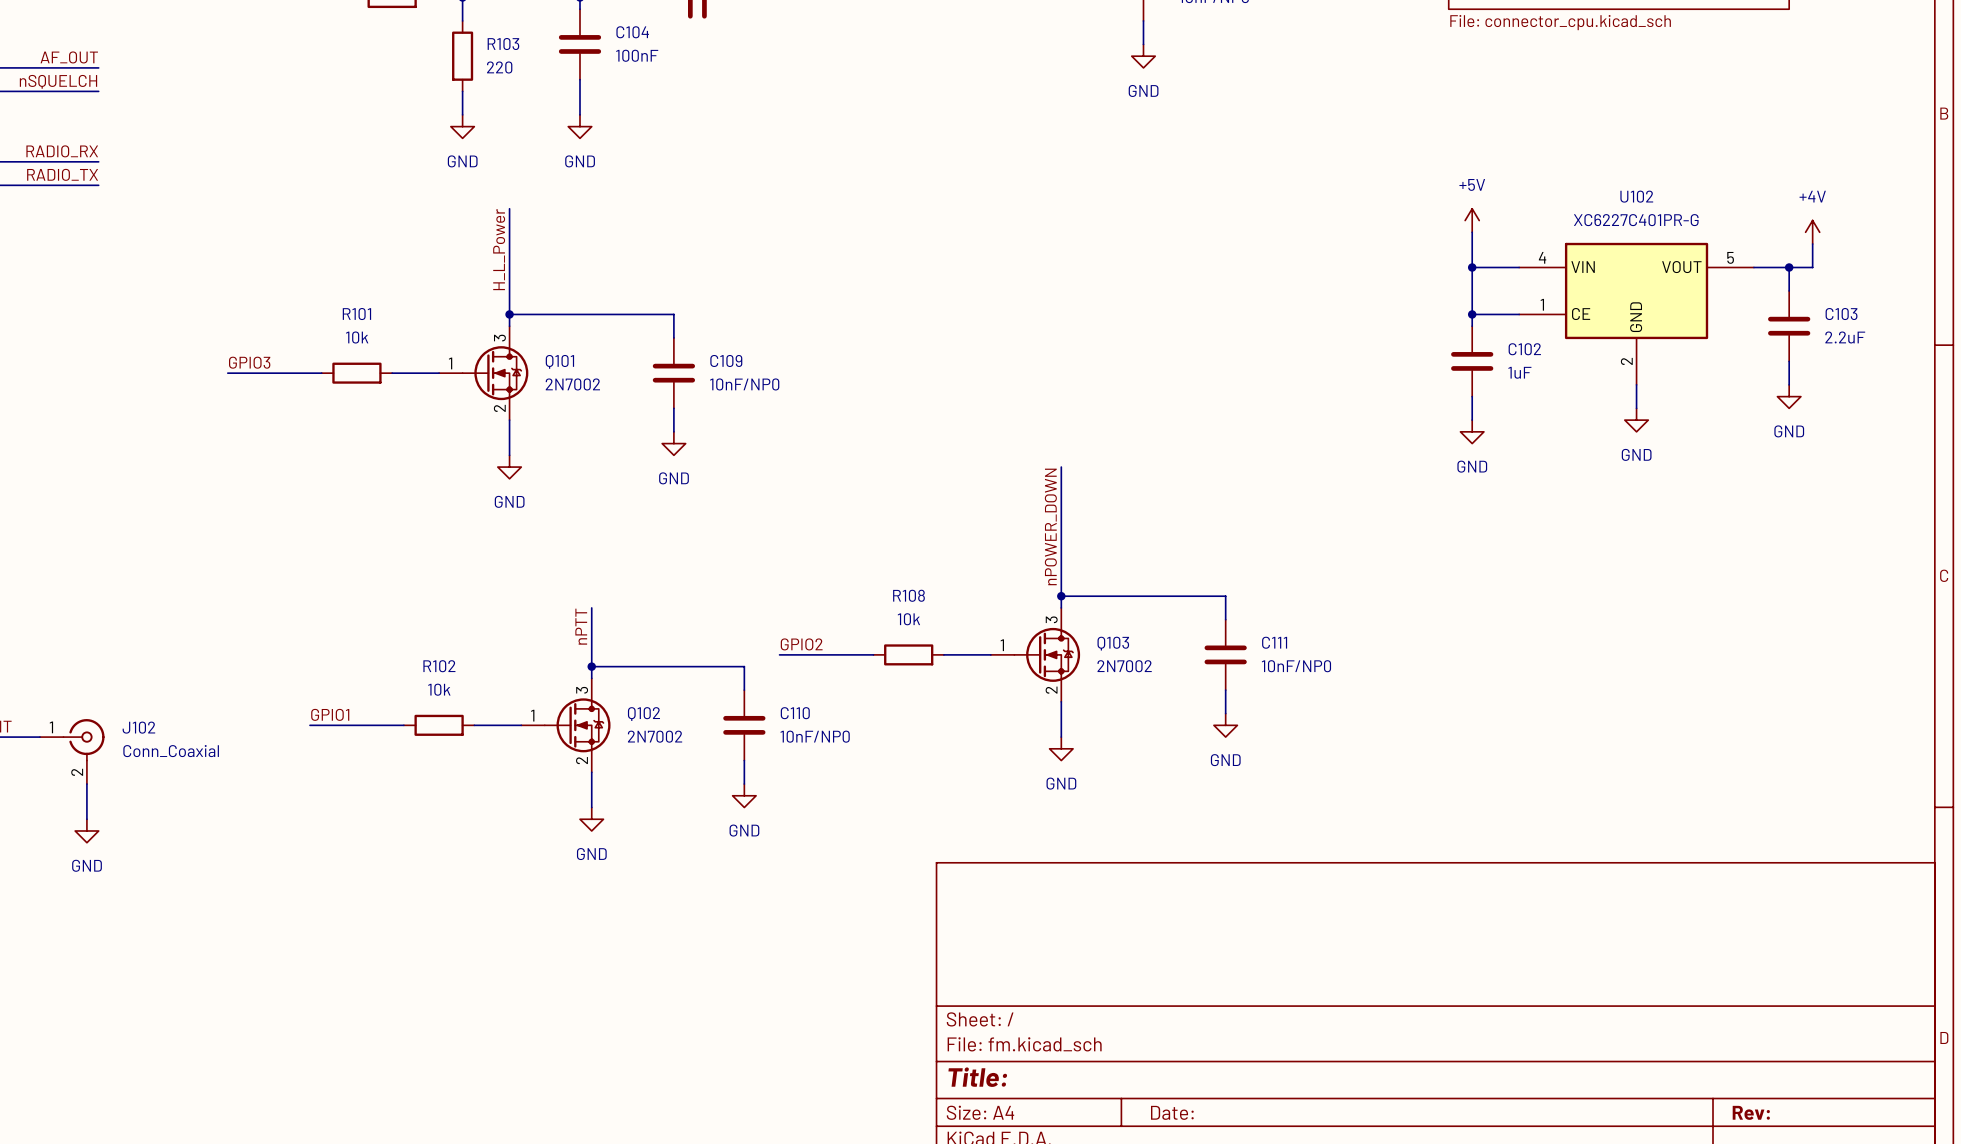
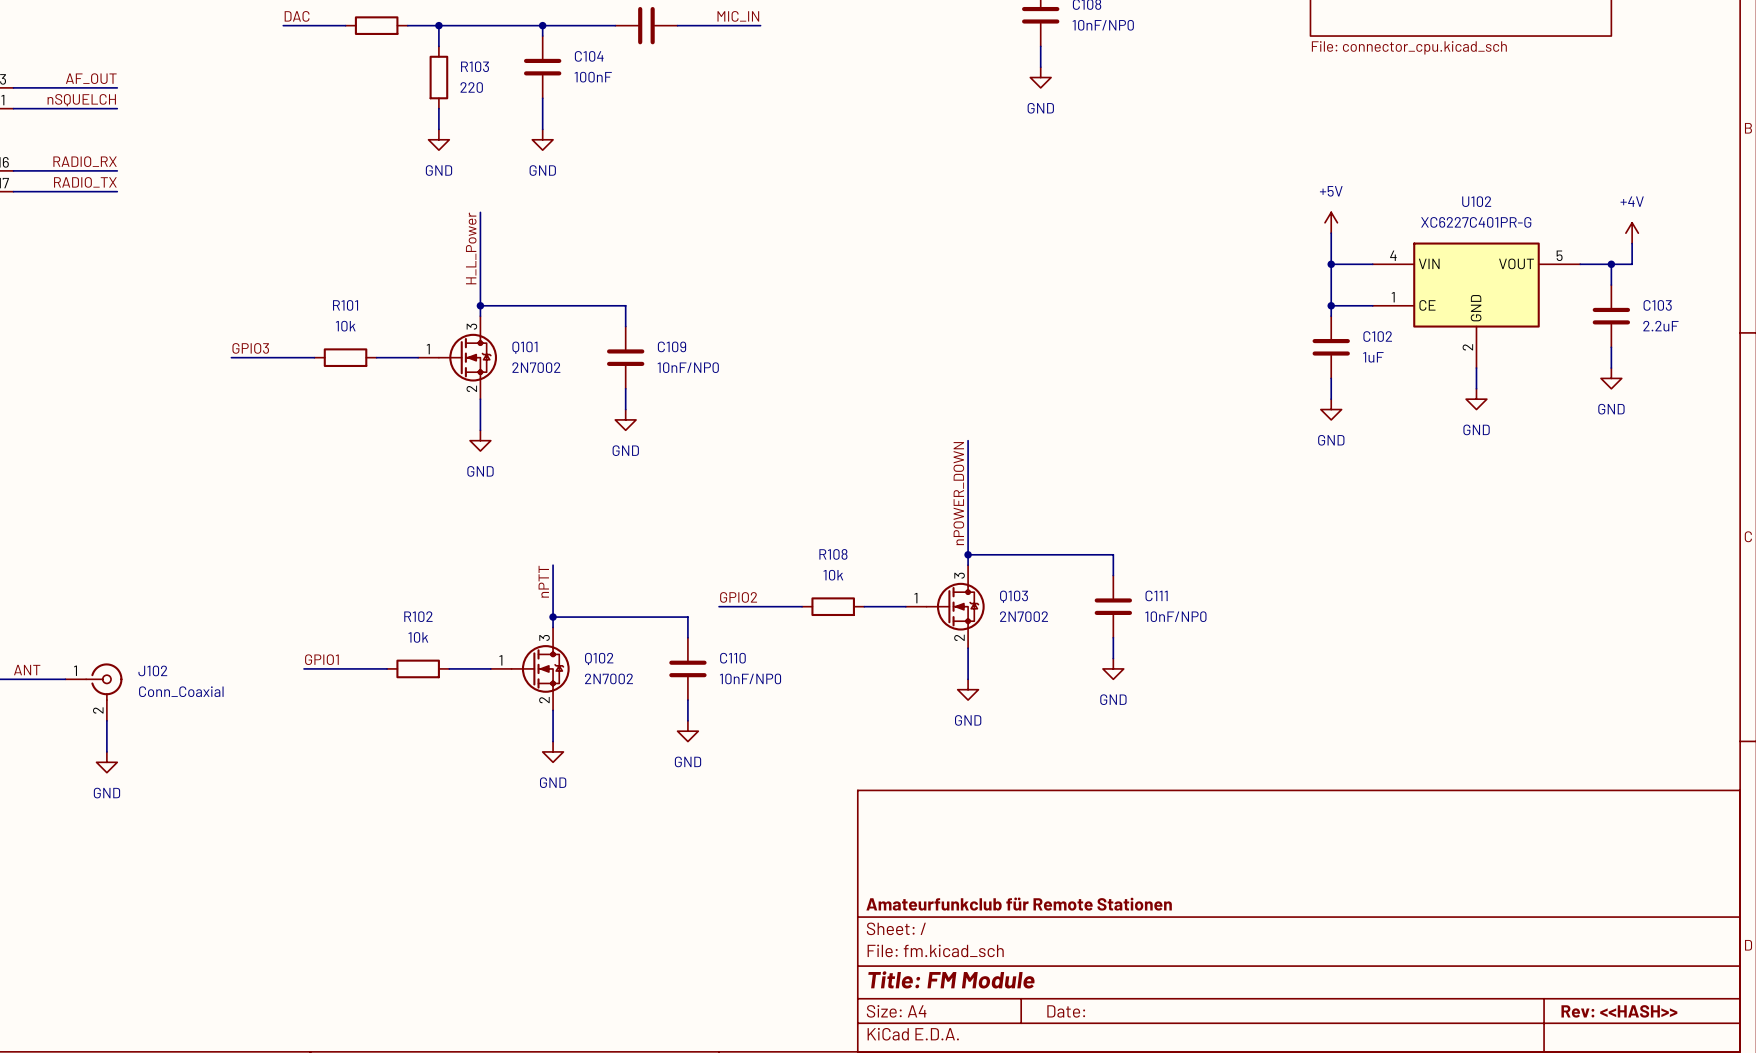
title block: none -> Amateurfunkclub für Remote Stationen (1019, 904)
title block: Title: (977, 1077) -> Title: FM Module (951, 979)
title block: Rev: (1751, 1112) -> Rev: <<HASH>> (1619, 1011)

